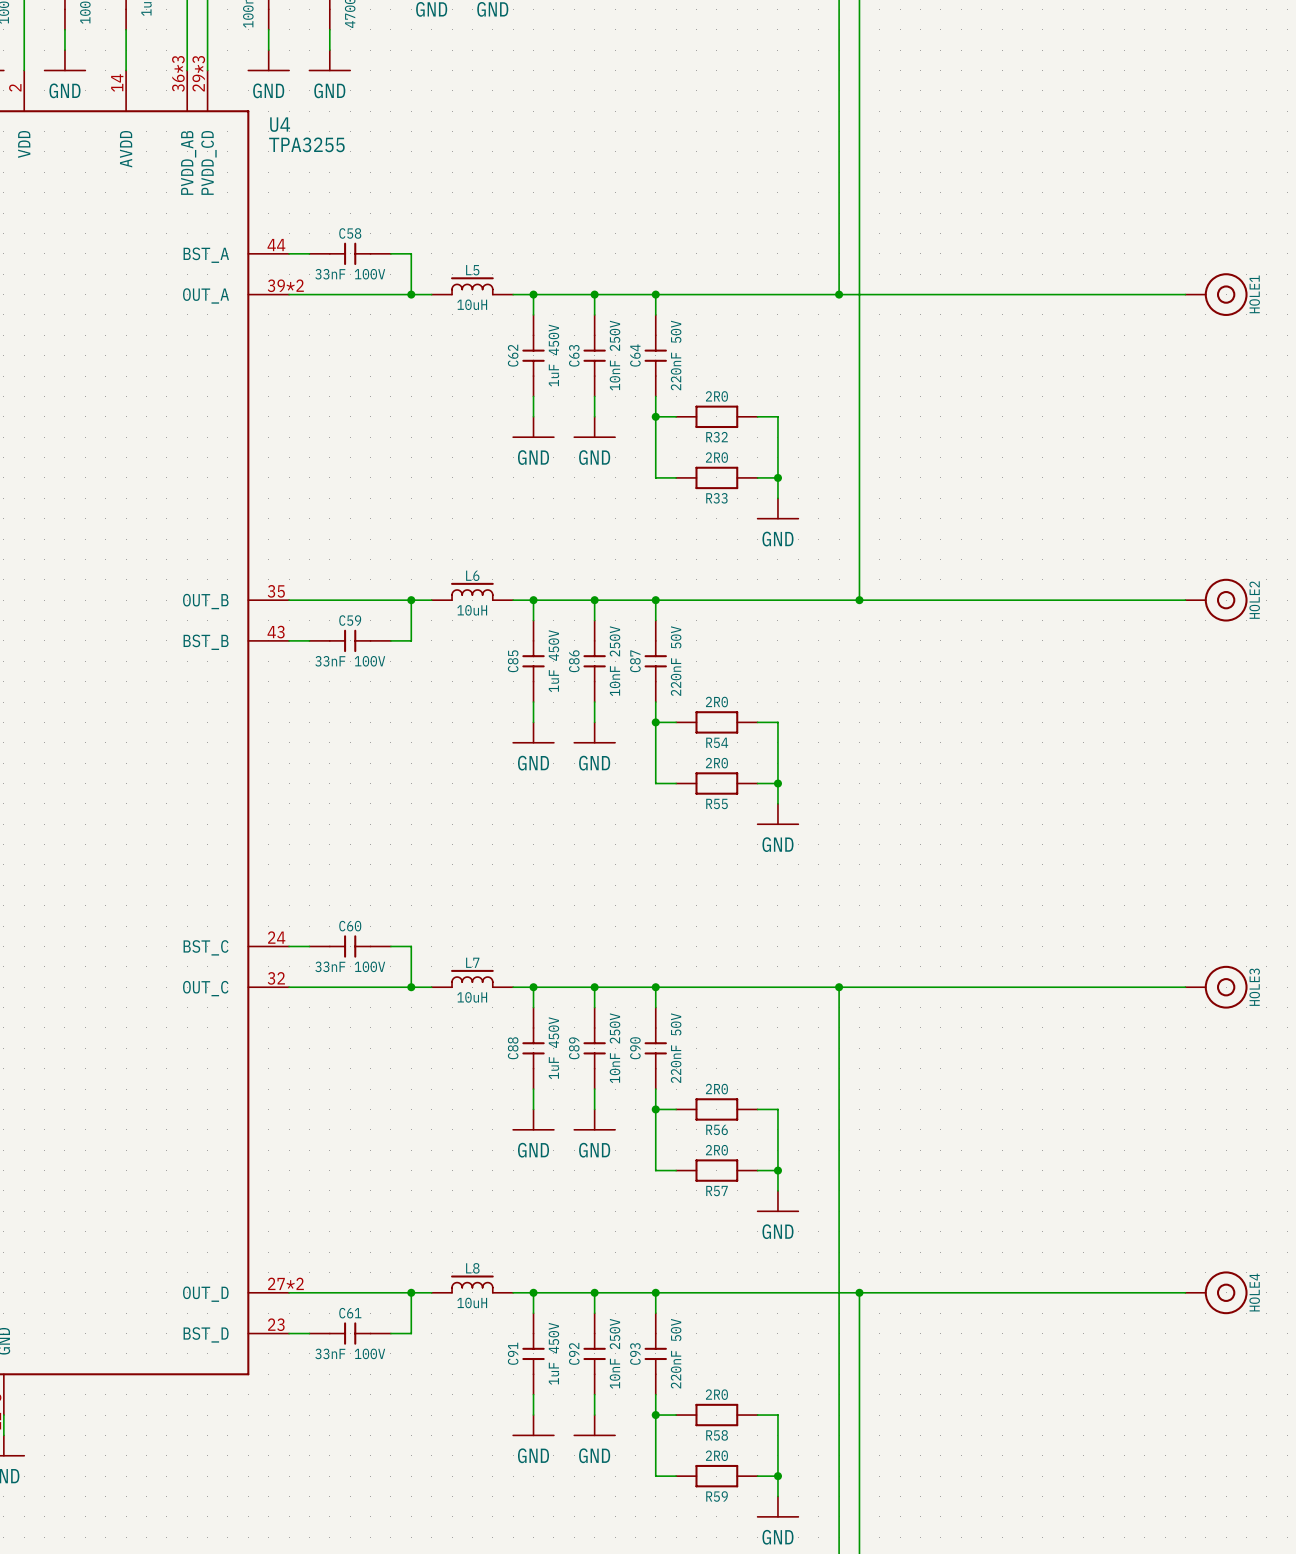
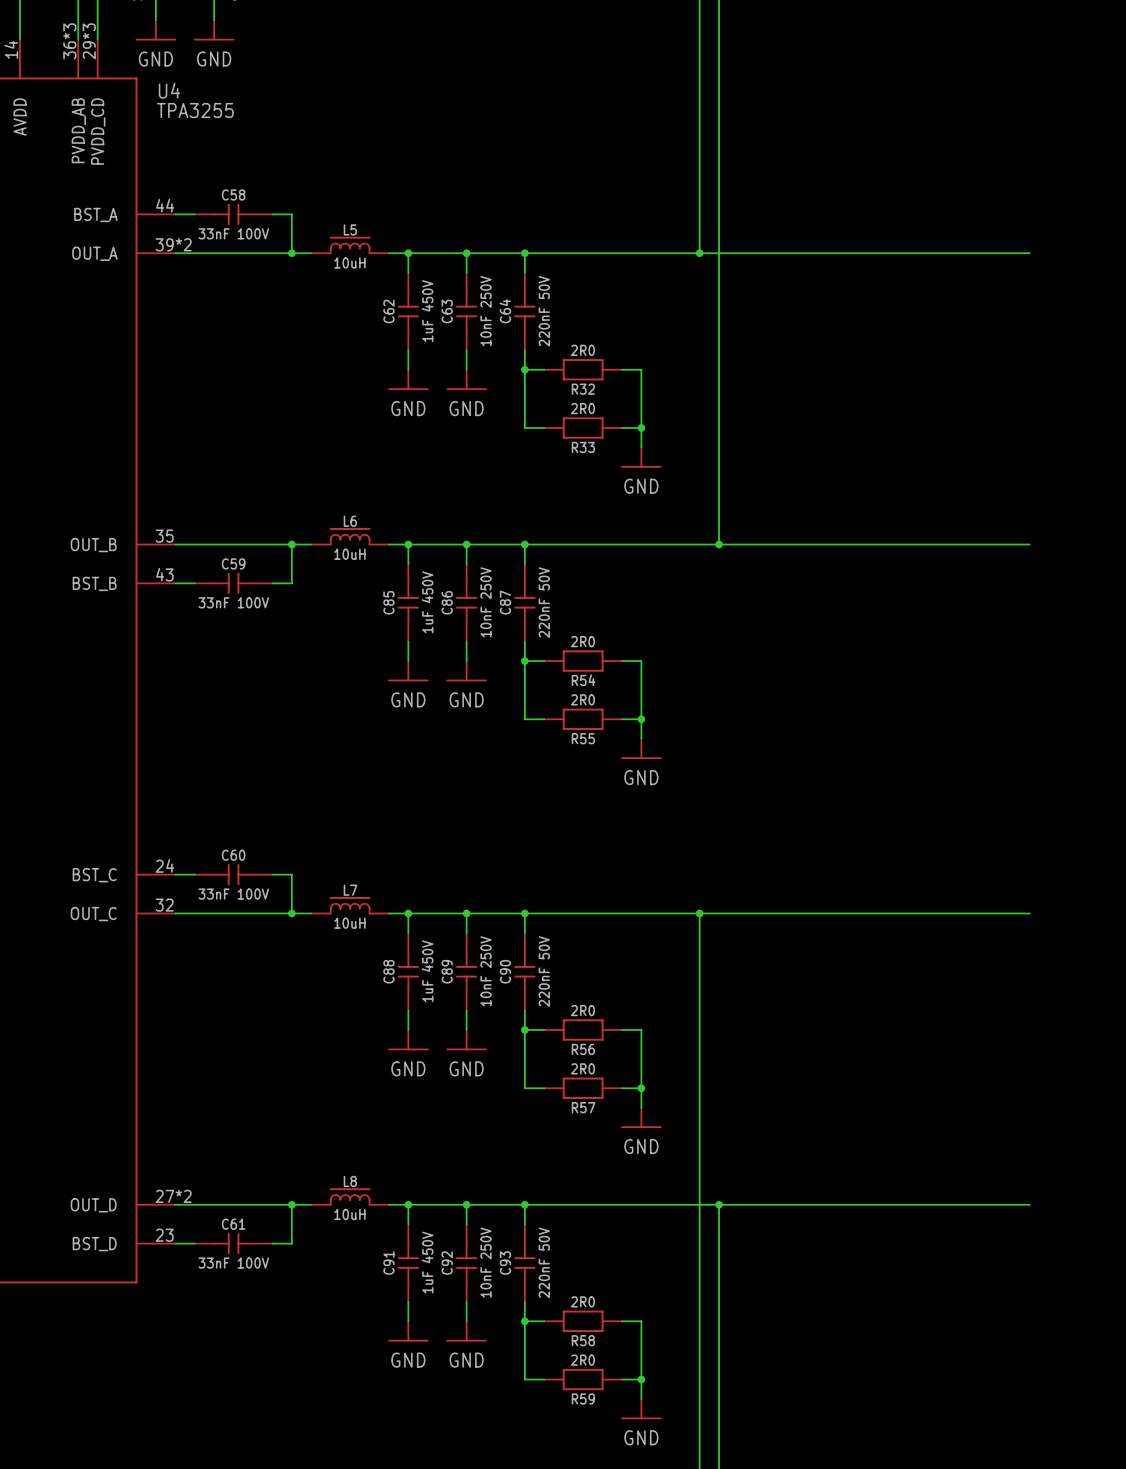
HOLE1: (1216, 294) -> none
HOLE2: (1216, 600) -> none
HOLE3: (1216, 987) -> none
HOLE4: (1216, 1292) -> none

